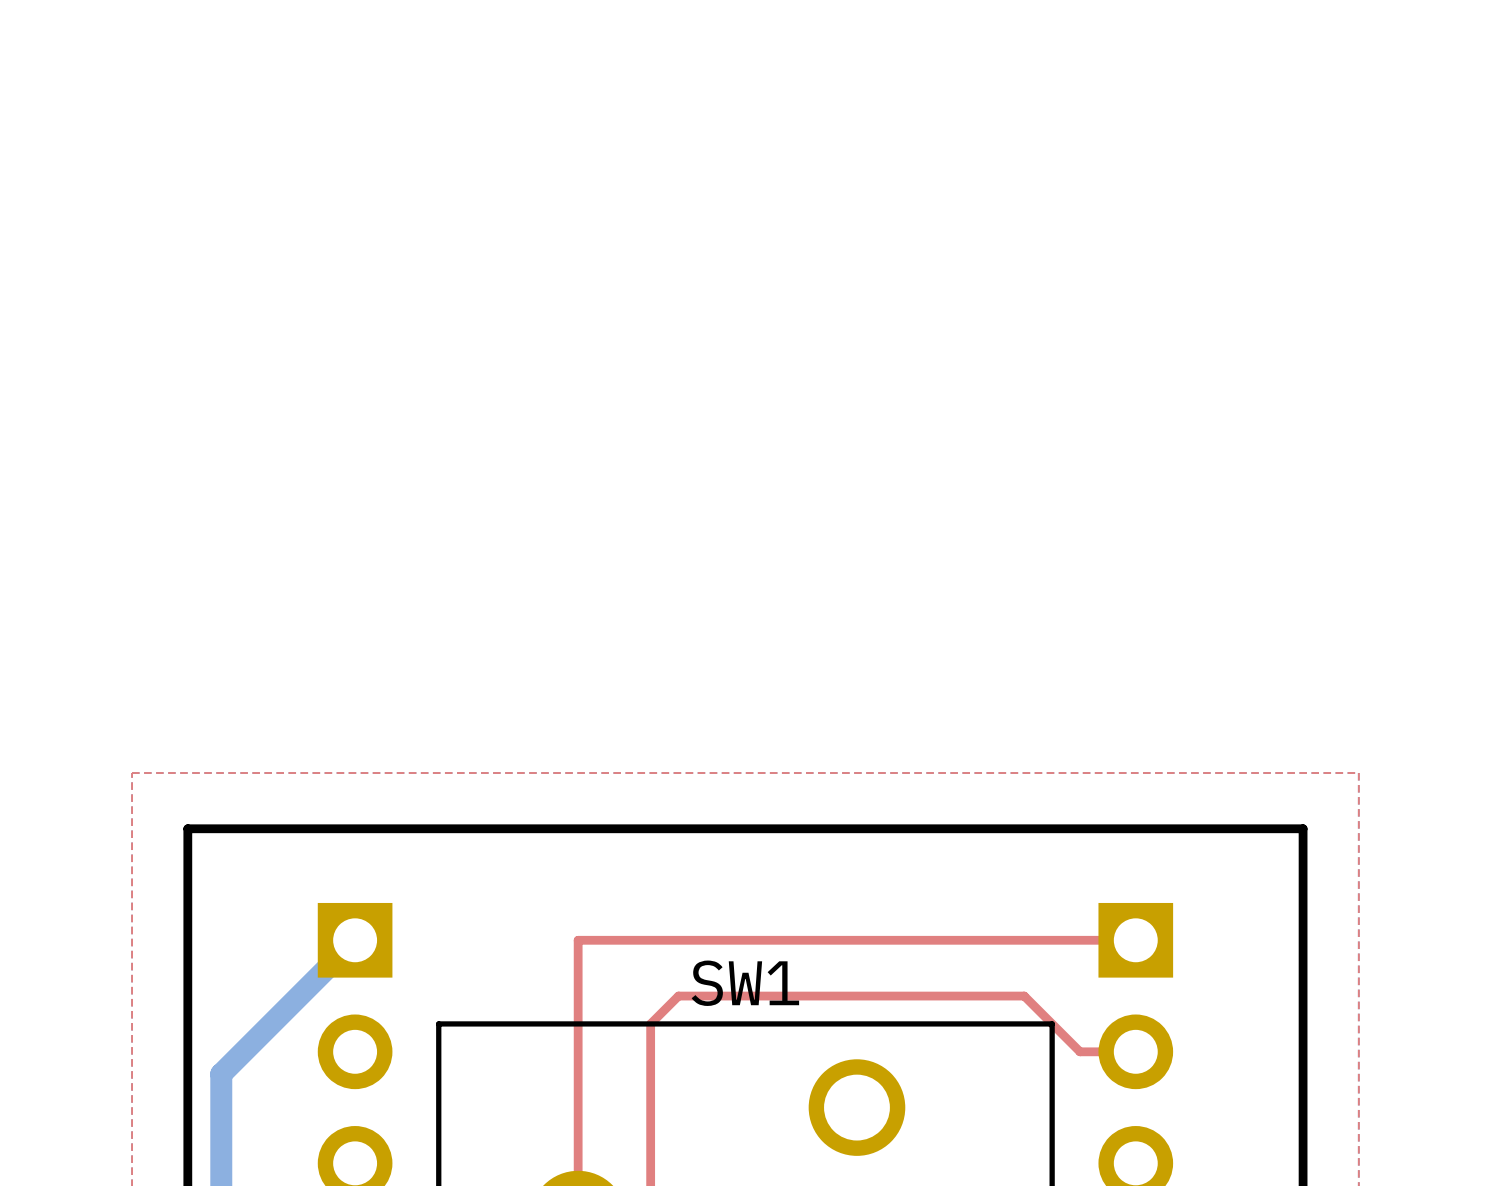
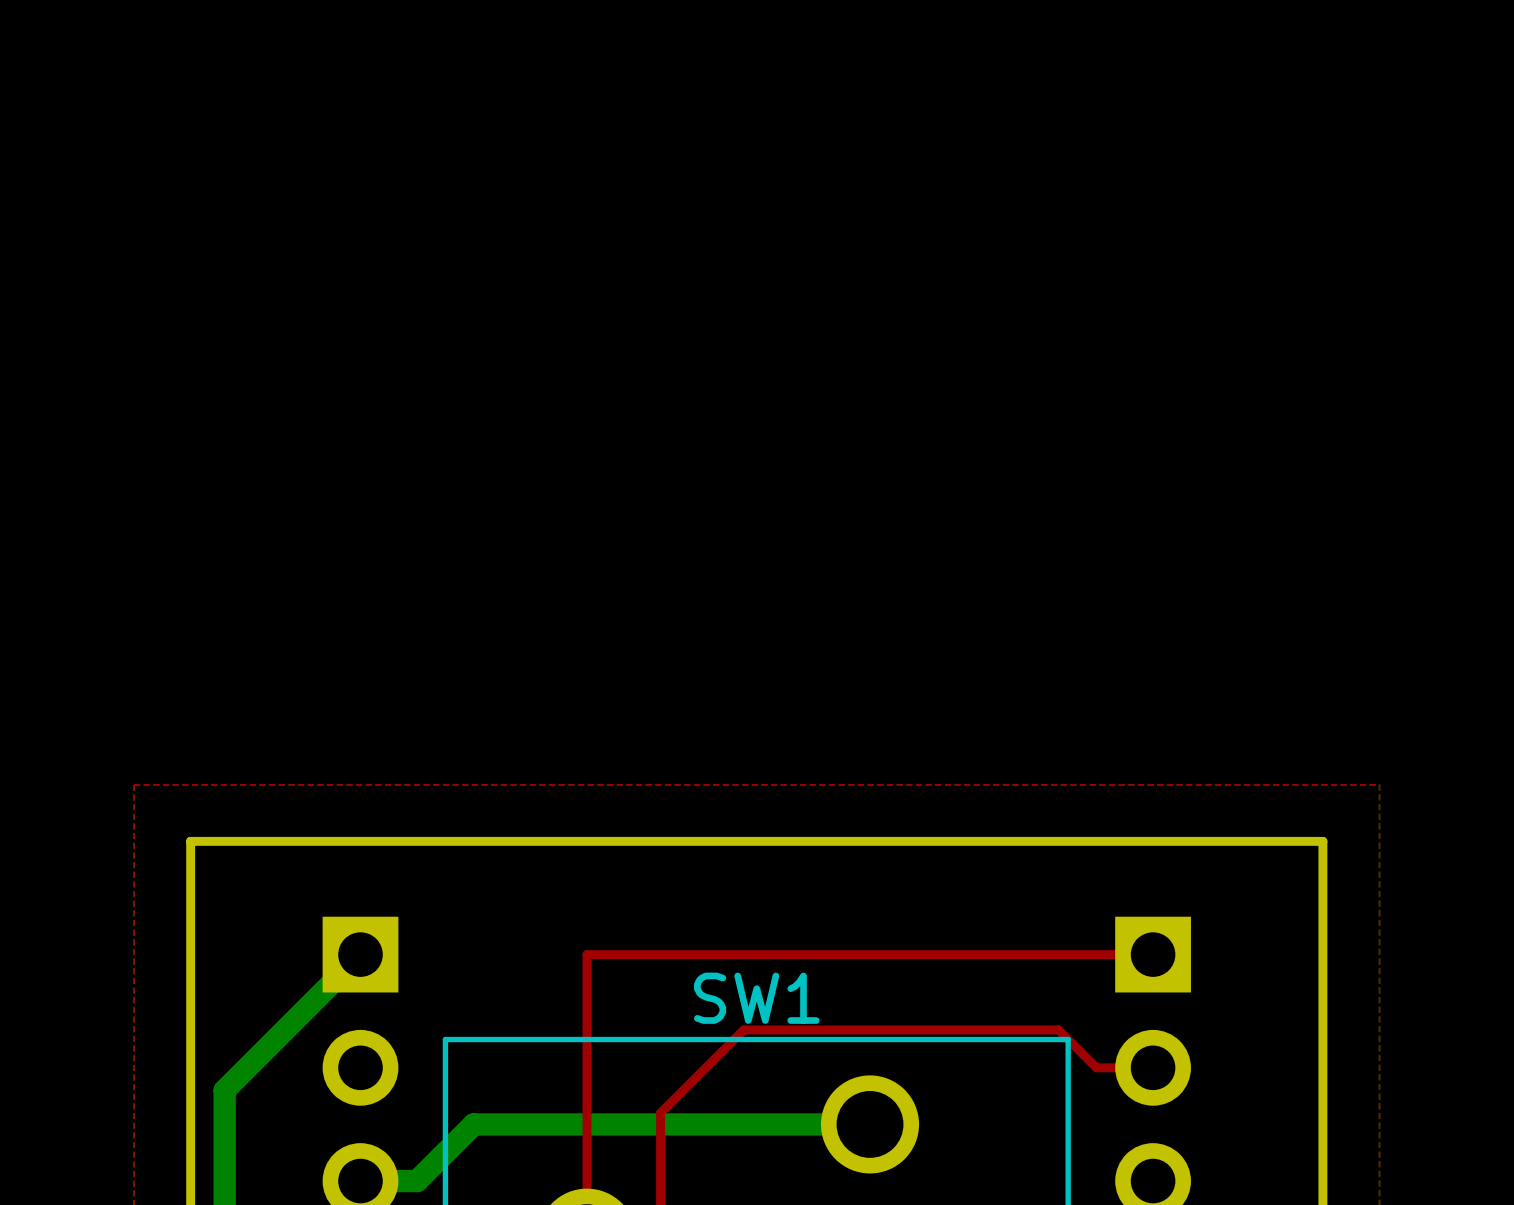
top track: (1042, 1014) (1024, 996) (678, 996) (650, 1023) (650, 1096) -> (1058, 1029) (743, 1029) (660, 1113)
bottom track: none -> (870, 1124) (473, 1124) (417, 1181) (360, 1181)

